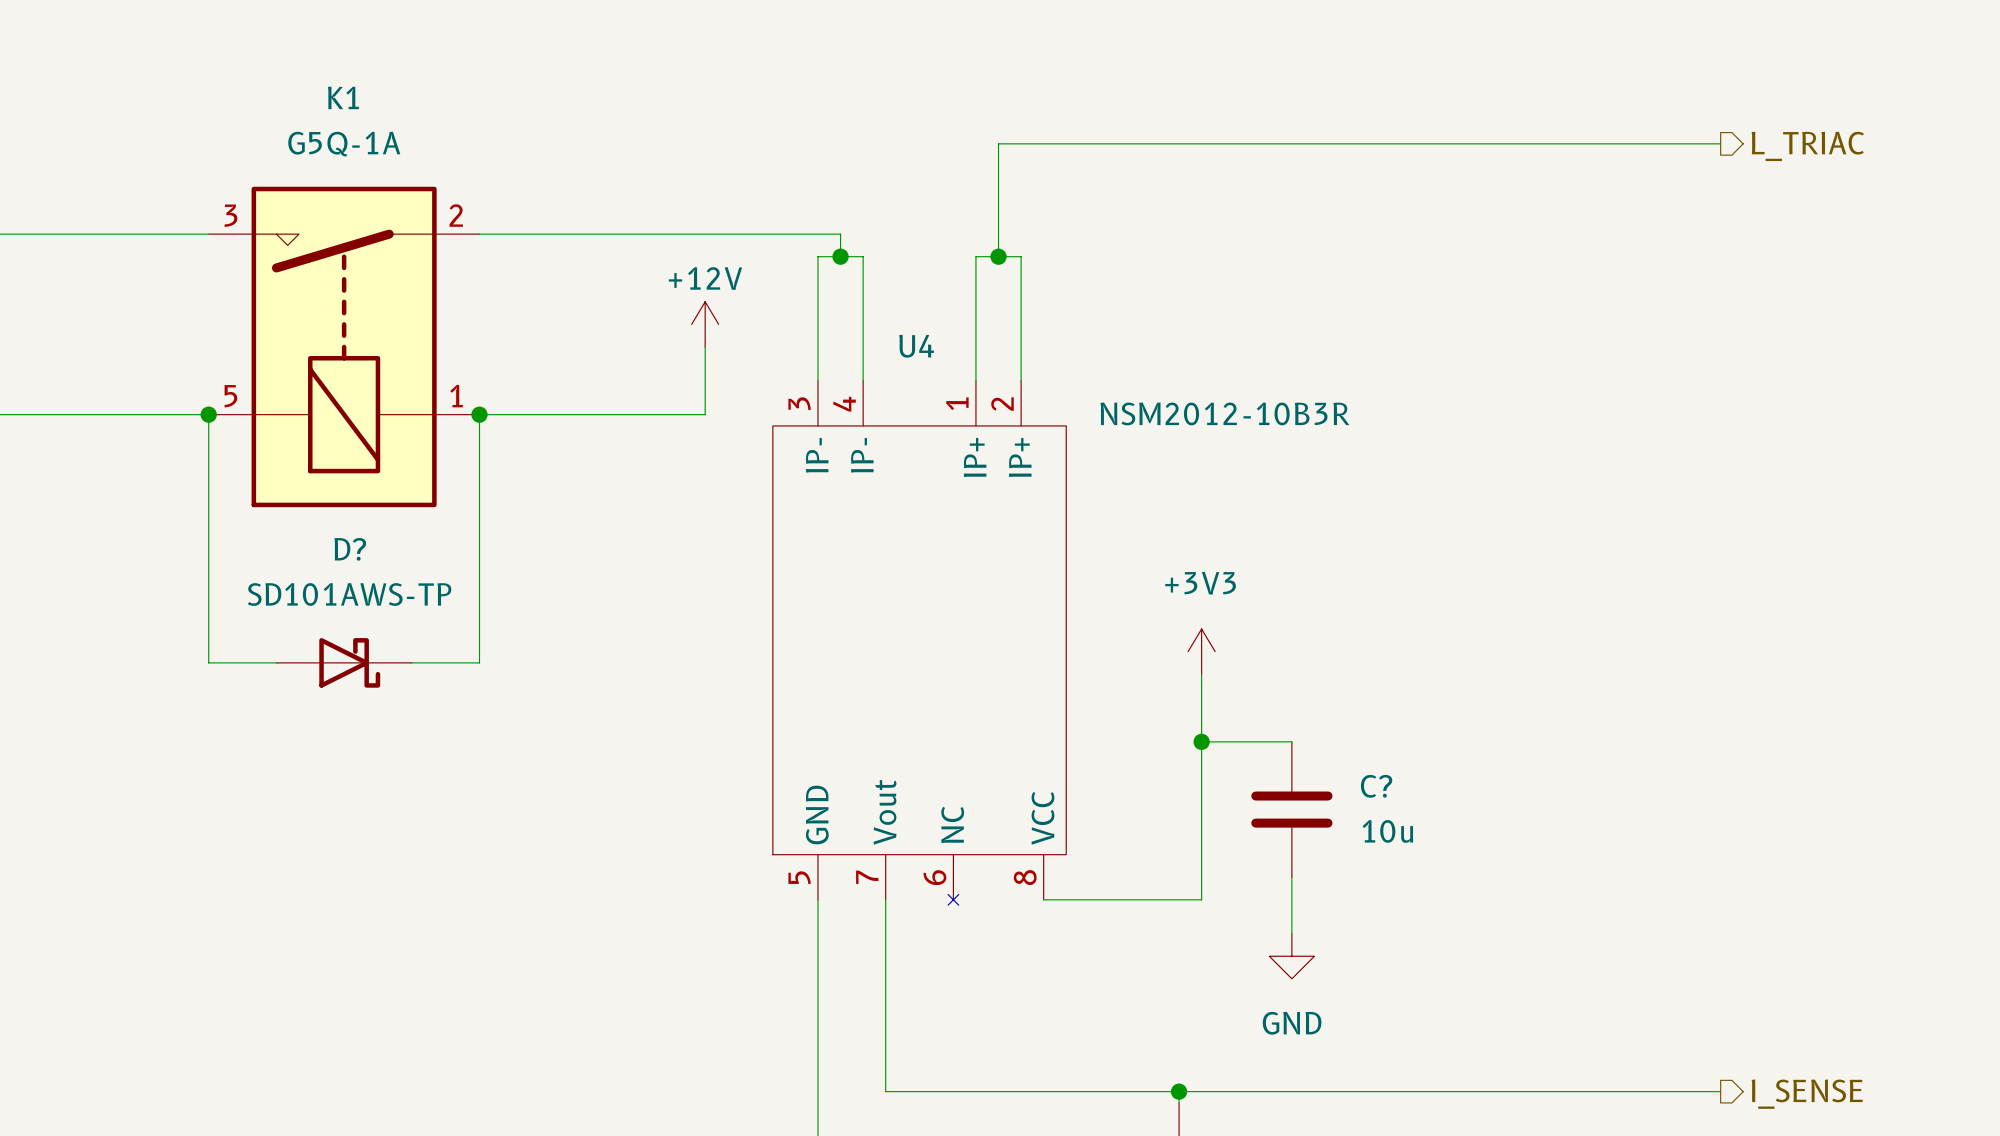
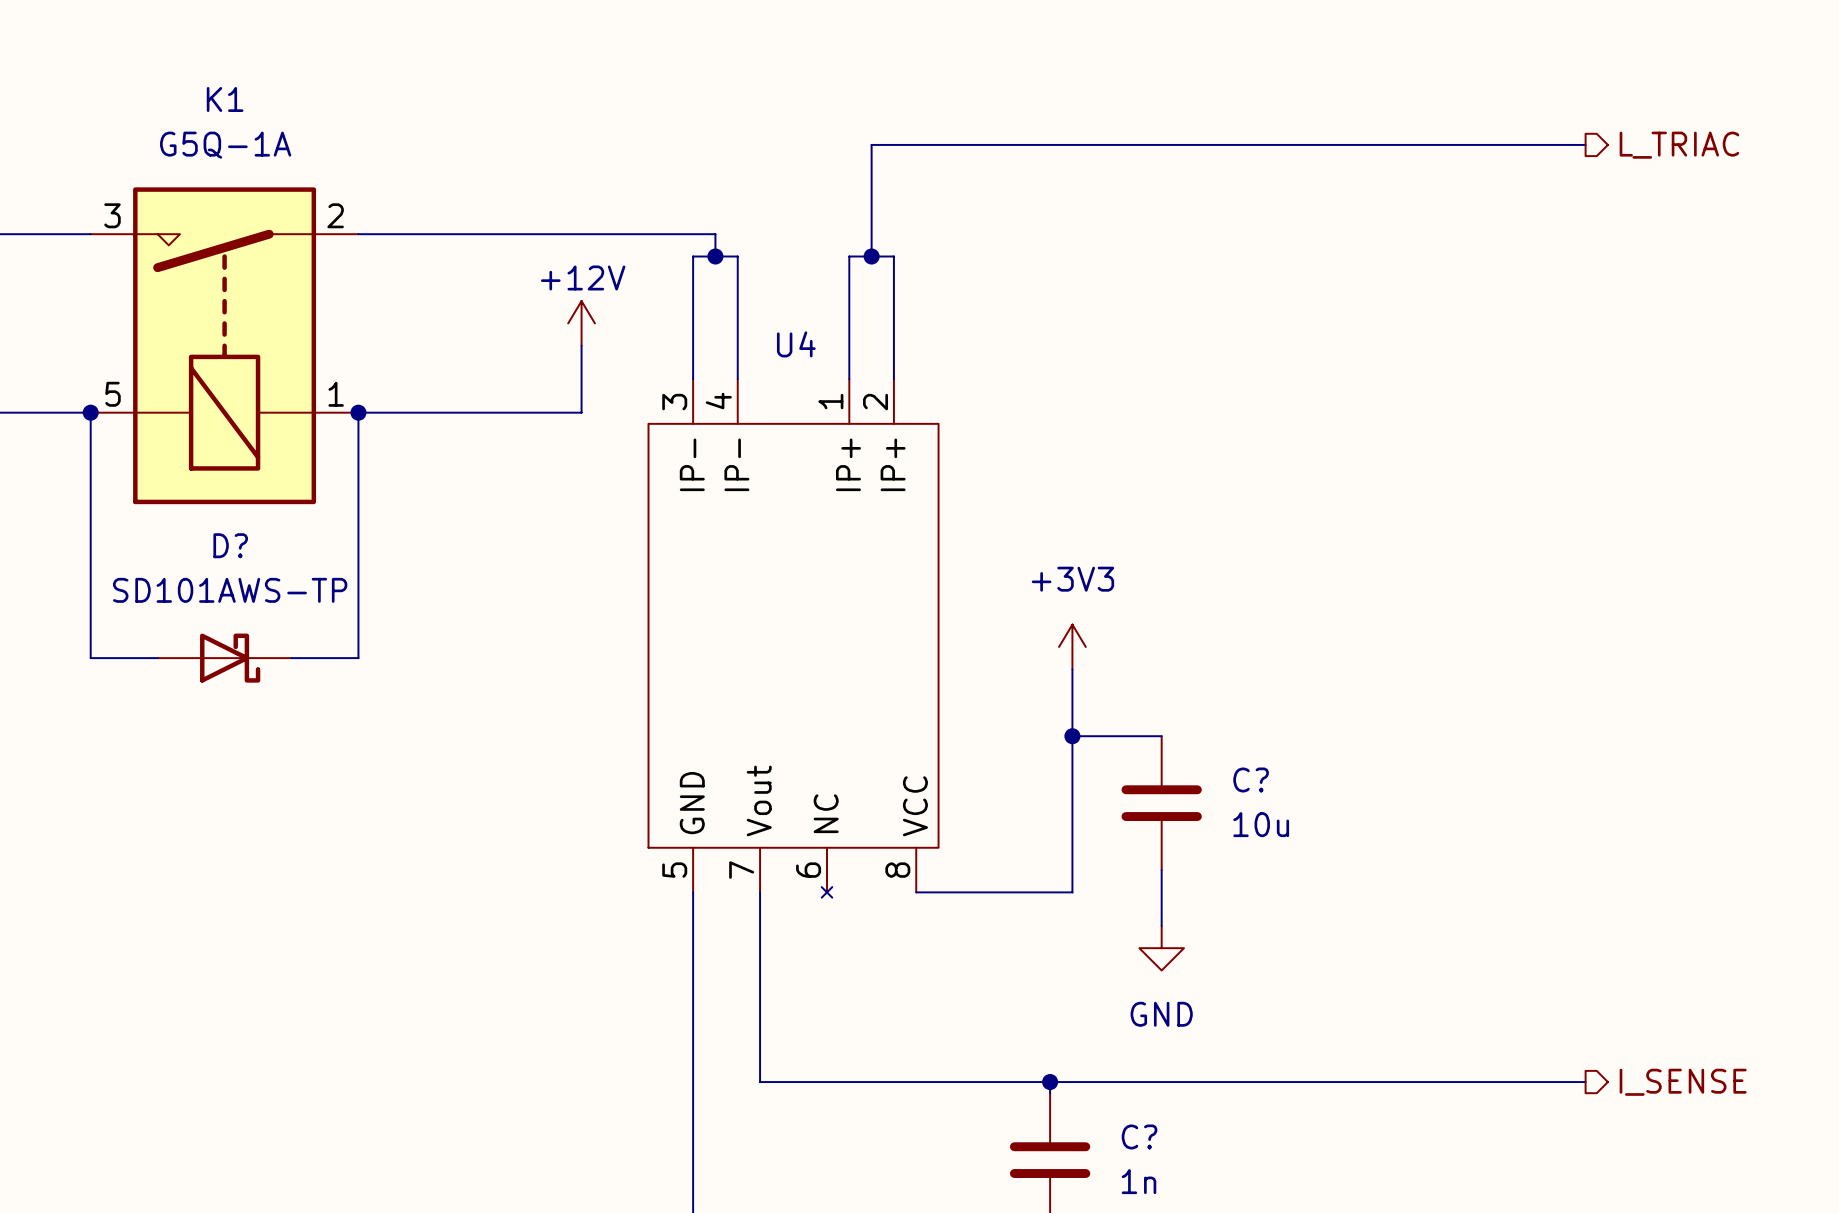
U4 value: NSM2012-10B3R (1224, 413) -> none

